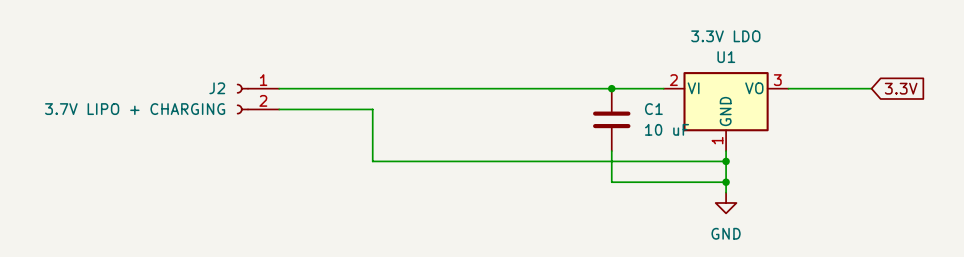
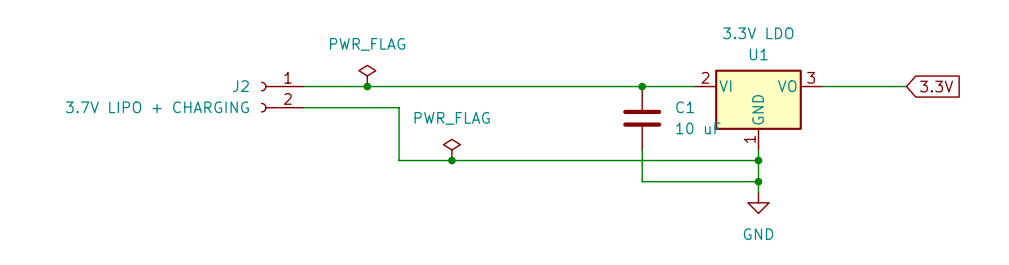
power symbol: none -> PWR_FLAG (367, 75)
junction: none -> (367, 86)
power symbol: none -> PWR_FLAG (451, 149)
junction: none -> (451, 160)

